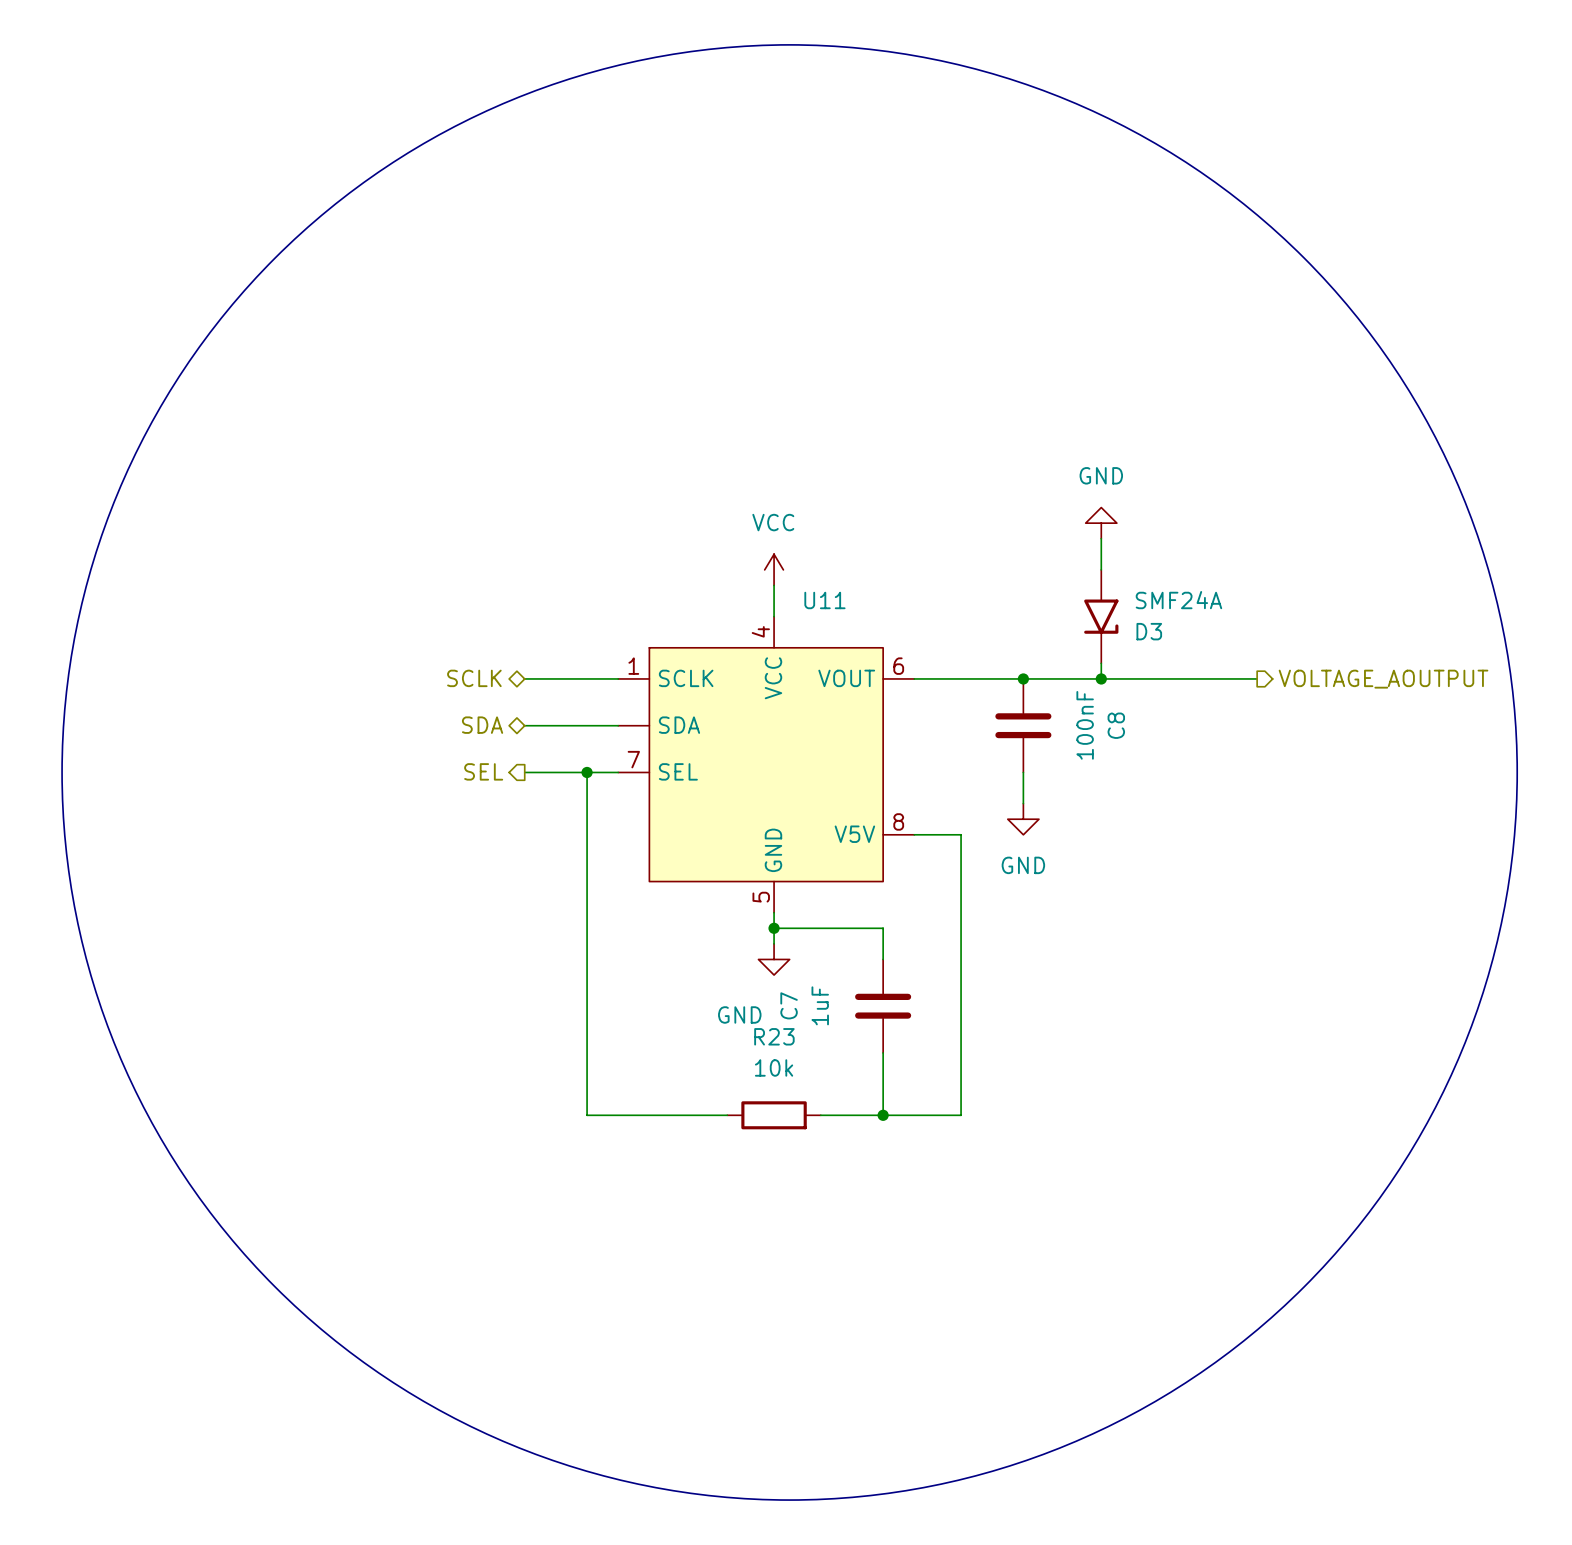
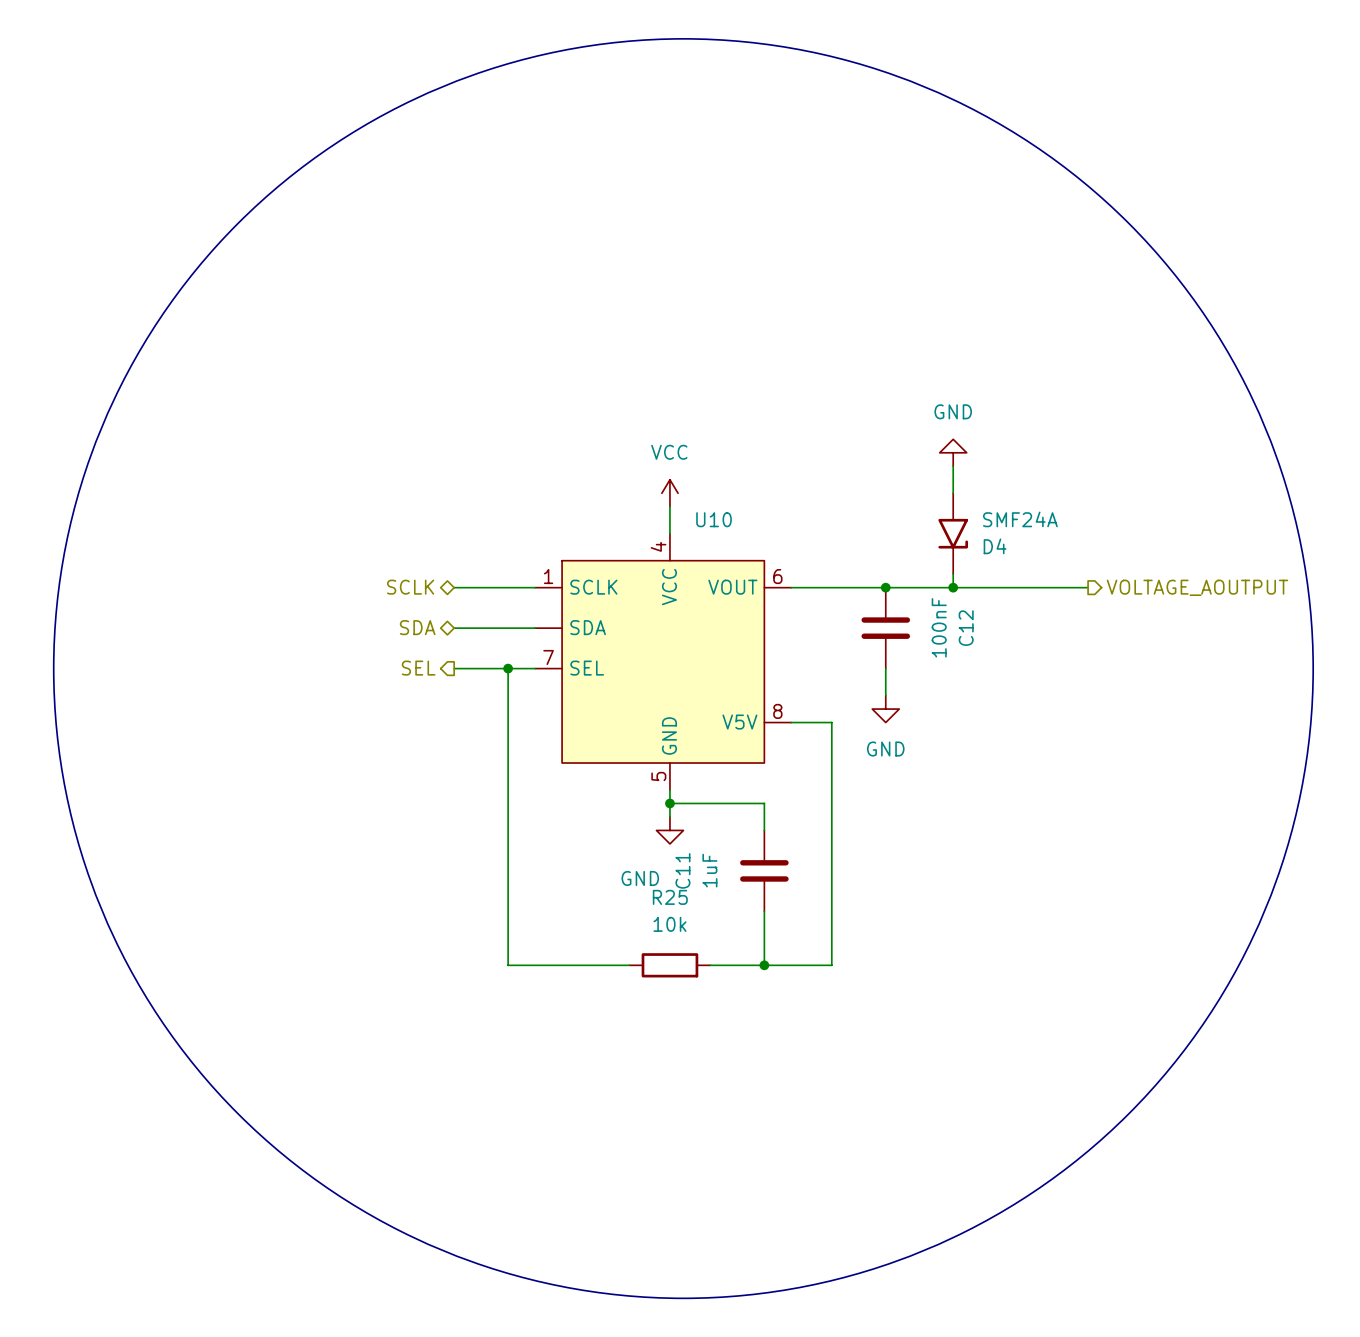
U11 name: U11 (824, 600) -> U10 (714, 519)
D3 name: D3 (1149, 631) -> D4 (995, 546)
C8 name: C8 (1116, 725) -> C12 (966, 628)
C7 name: C7 (789, 1005) -> C11 (682, 870)
R23 name: R23 (774, 1036) -> R25 (670, 897)

